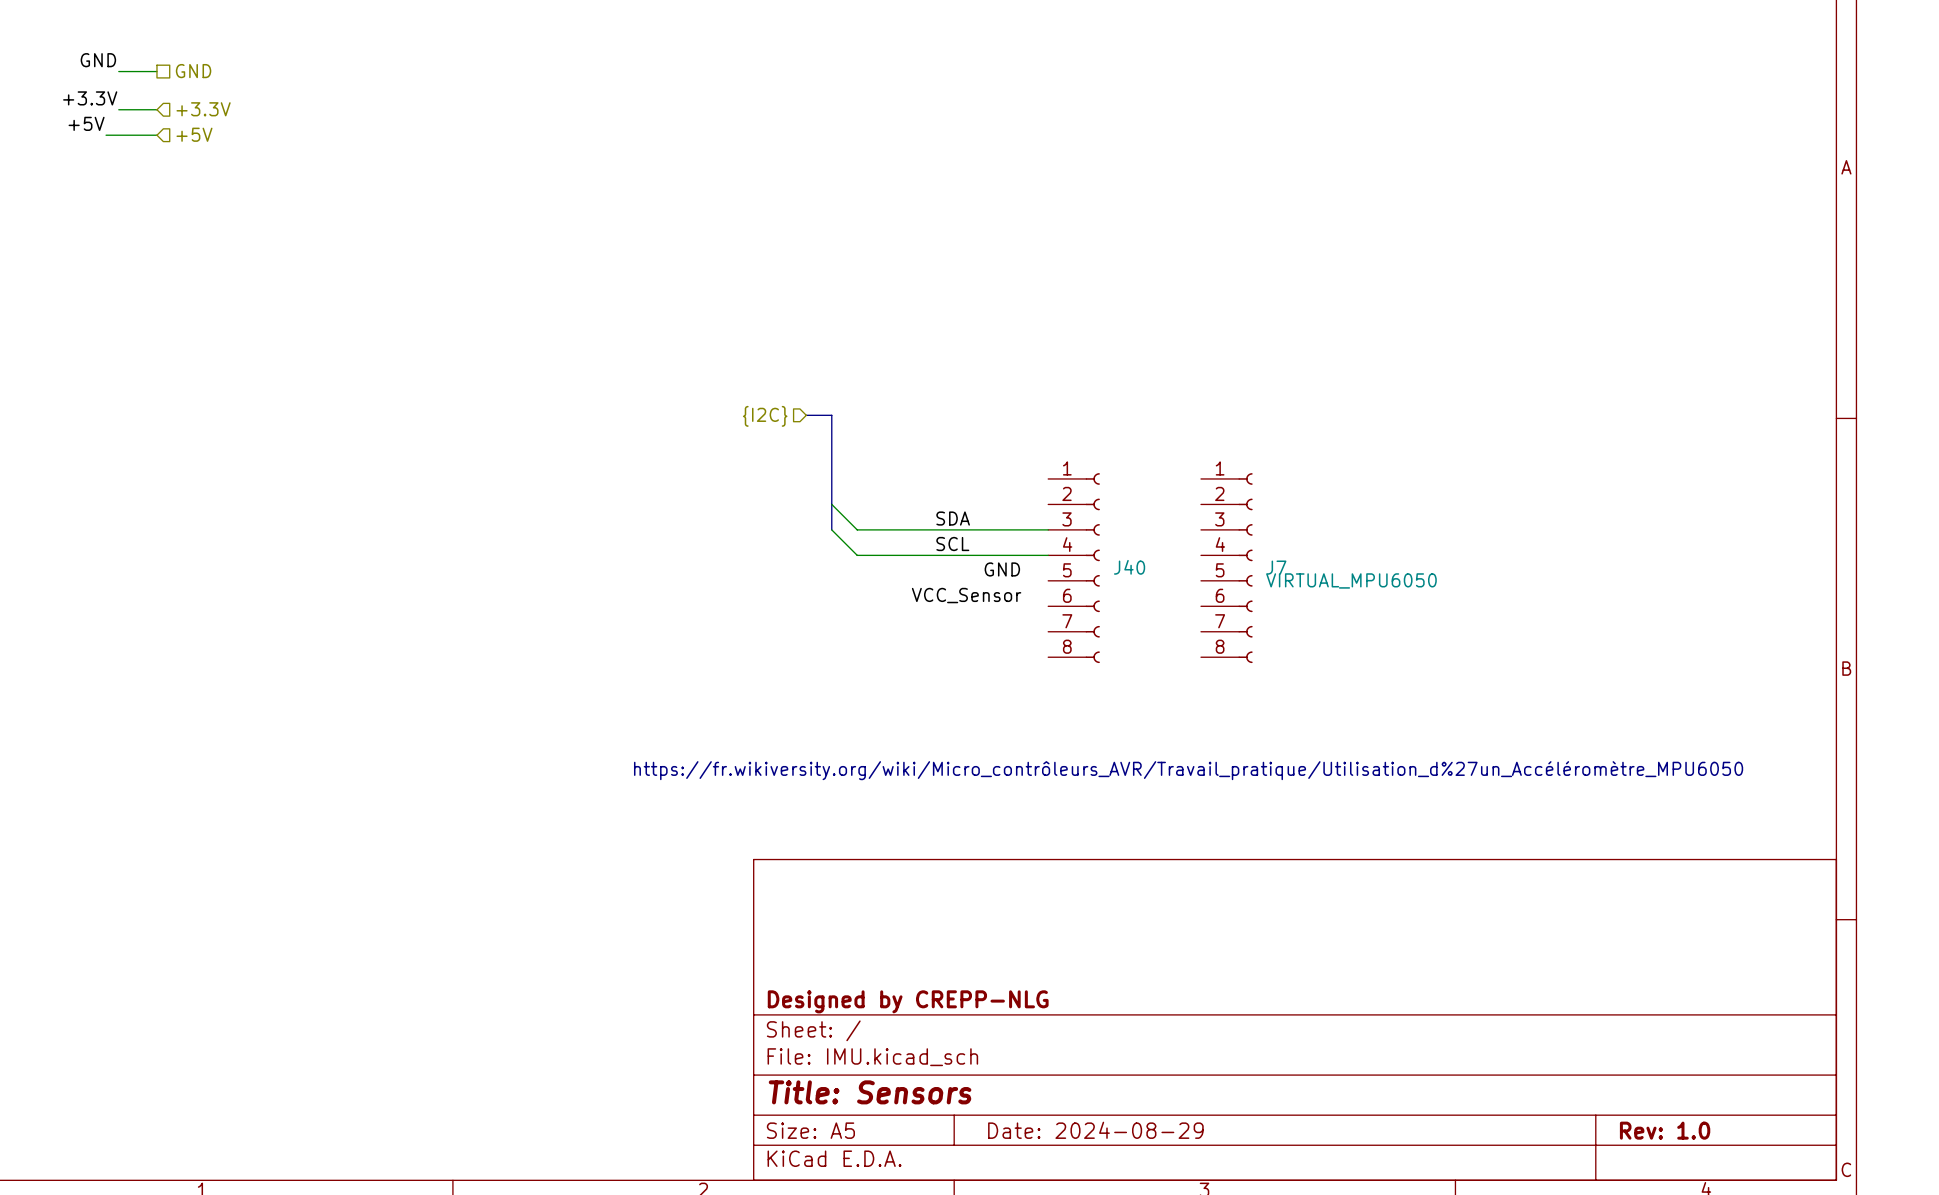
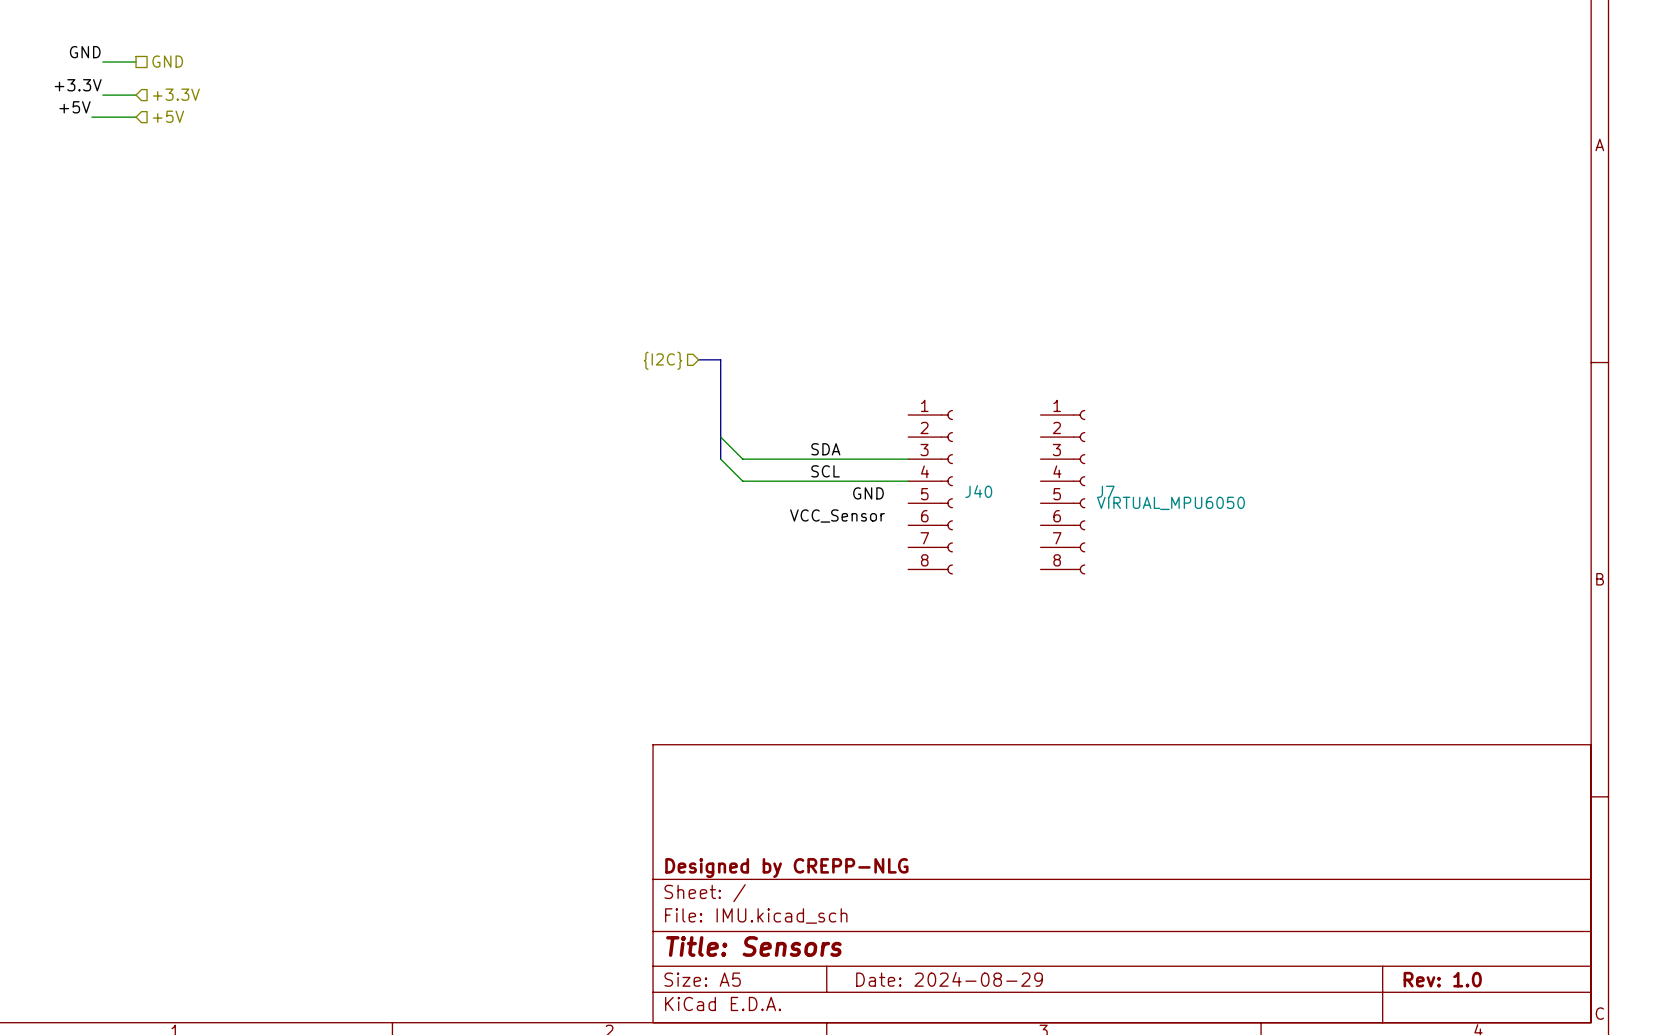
text: https://fr.wikiversity.org/wiki/Micro_contrôleurs_AVR/Travail_pratique/Utilisation_d%27un_Accéléromètre_MPU6050 (1188, 770) -> none

